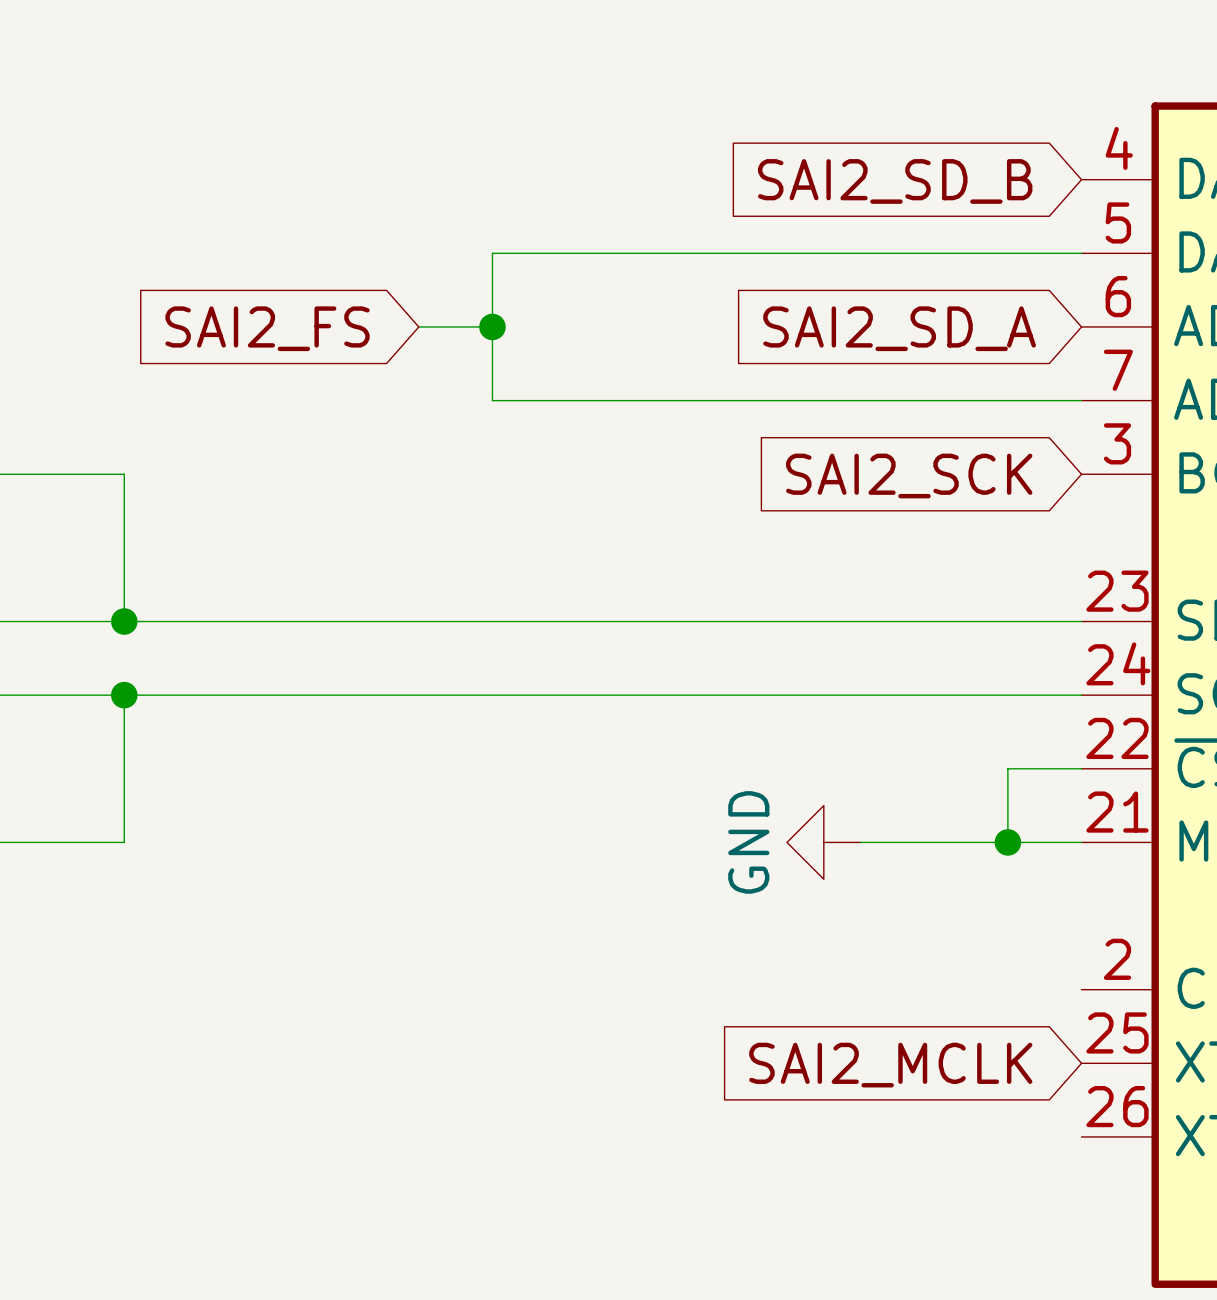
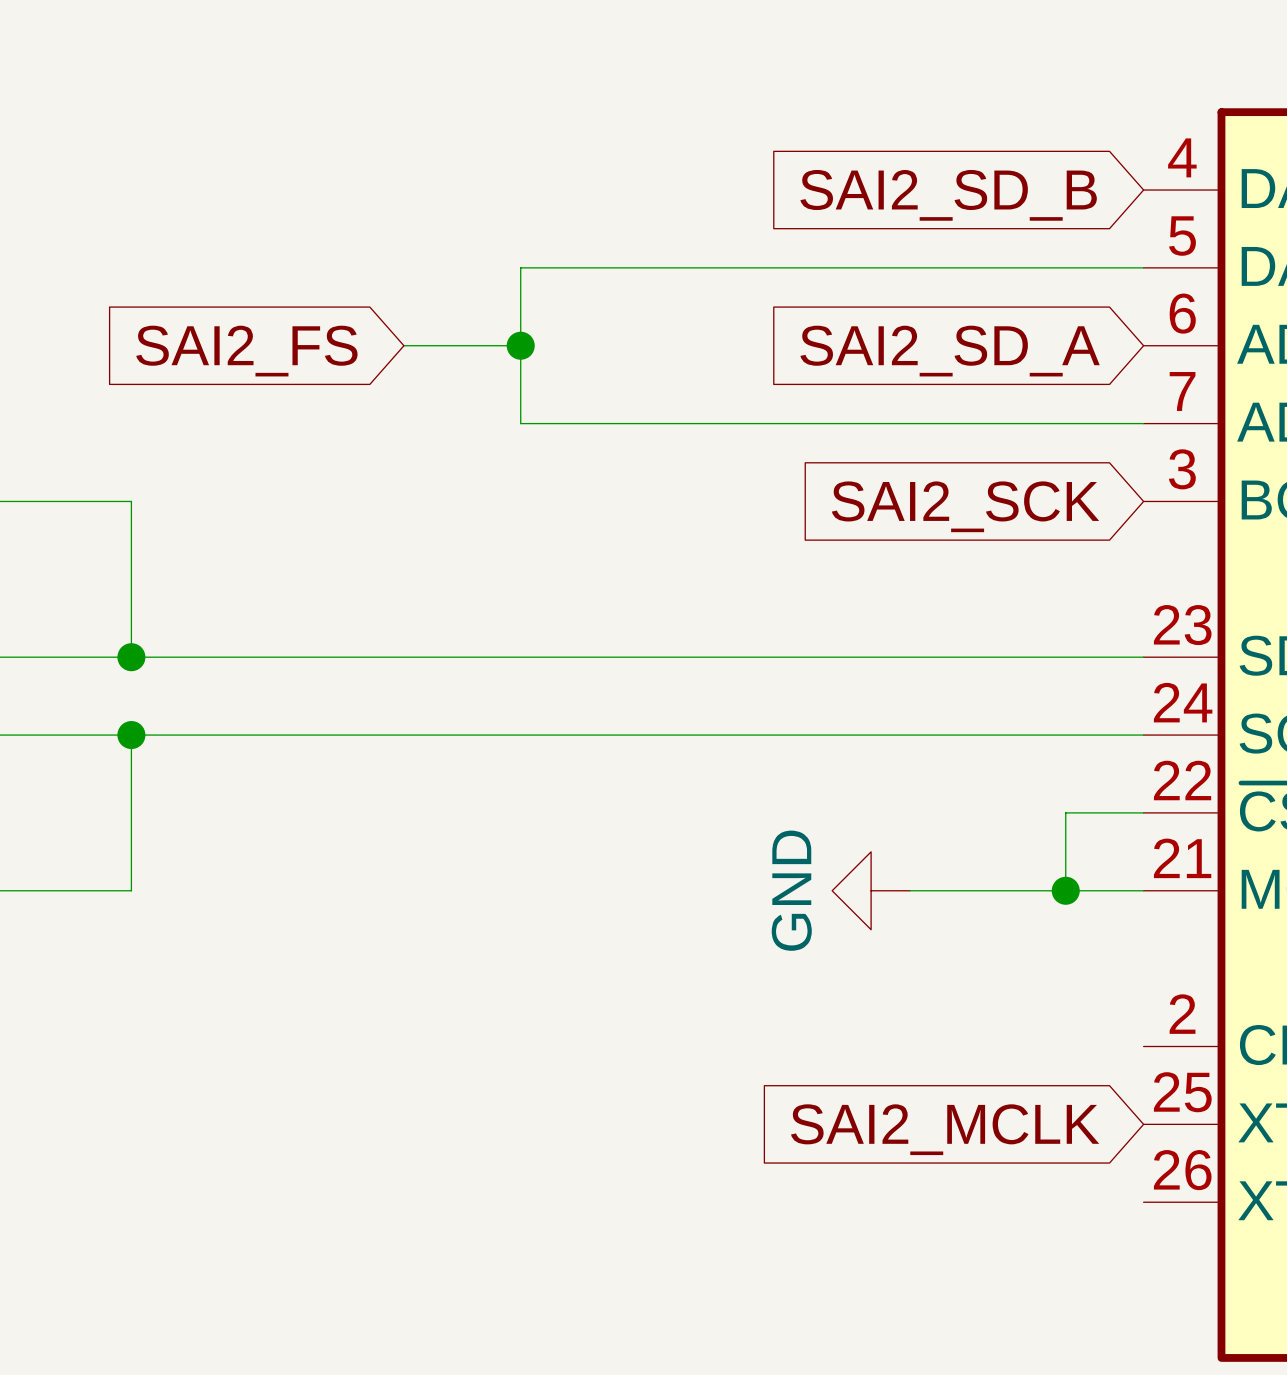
wire: none -> (403, 345) (442, 345)
global label position: SAI2_FS (267, 328) -> SAI2_FS (246, 351)

